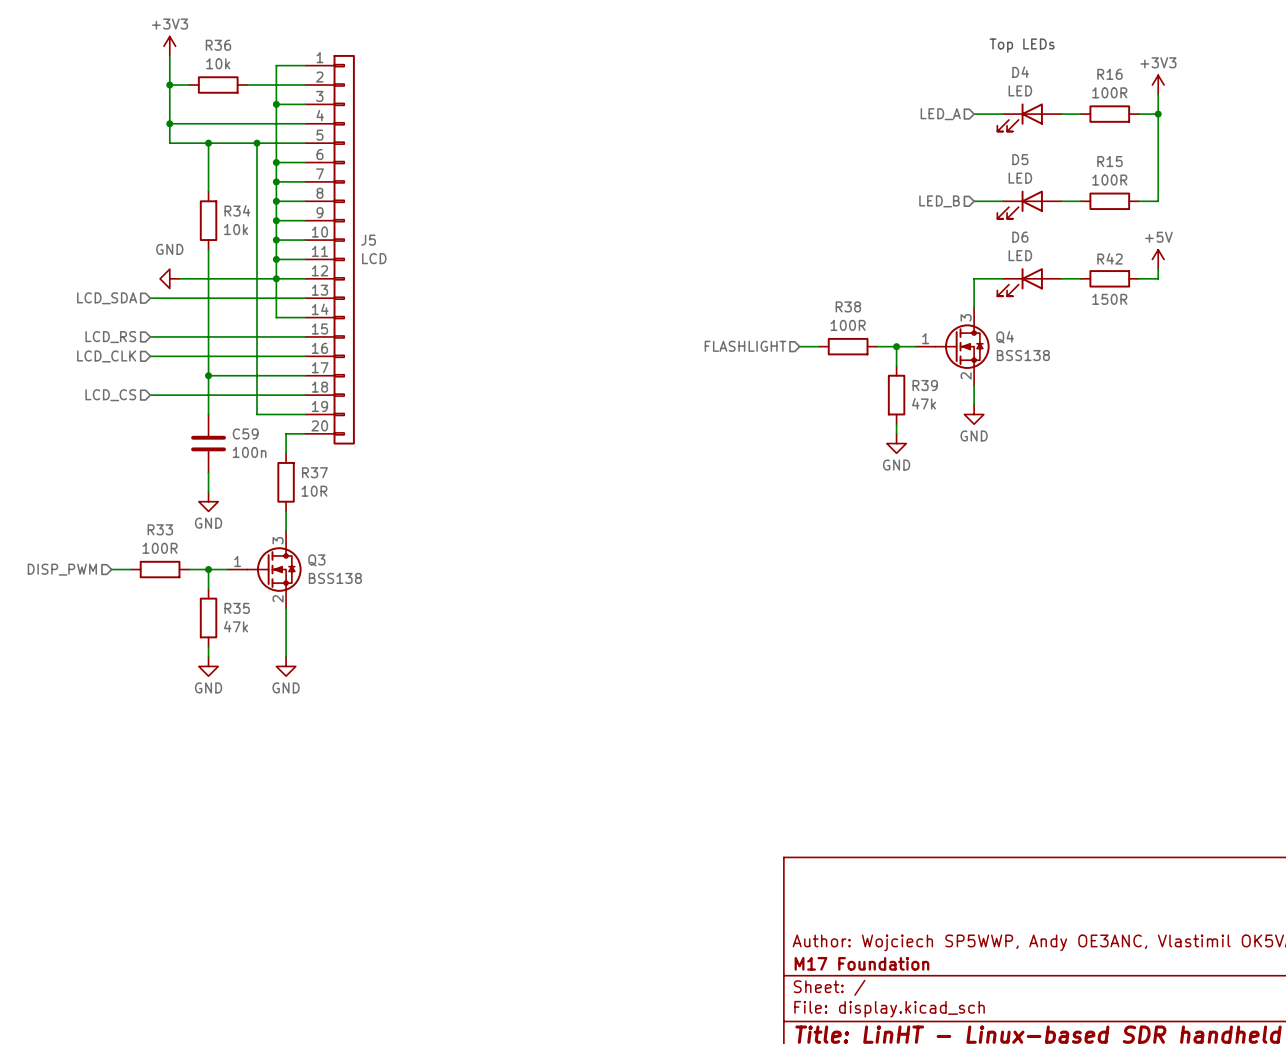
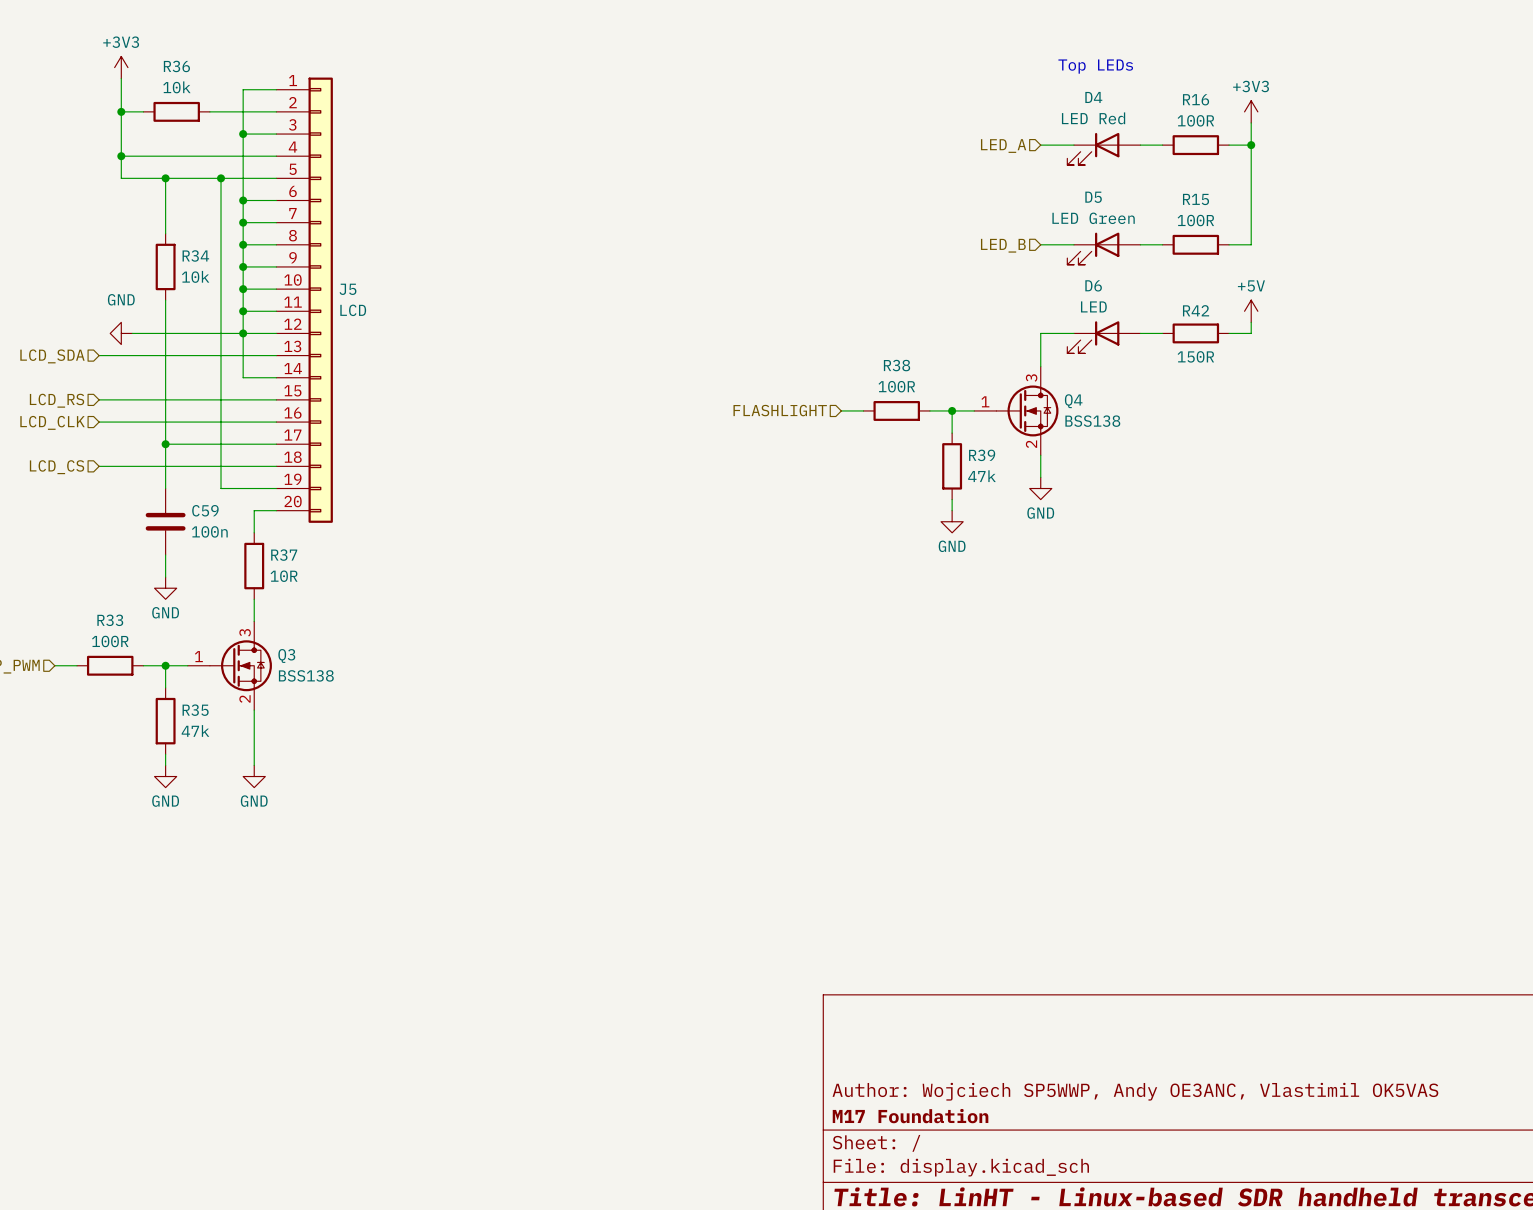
D4 value: LED (1020, 90) -> LED Red (1093, 118)
D5 value: LED (1020, 178) -> LED Green (1093, 218)

